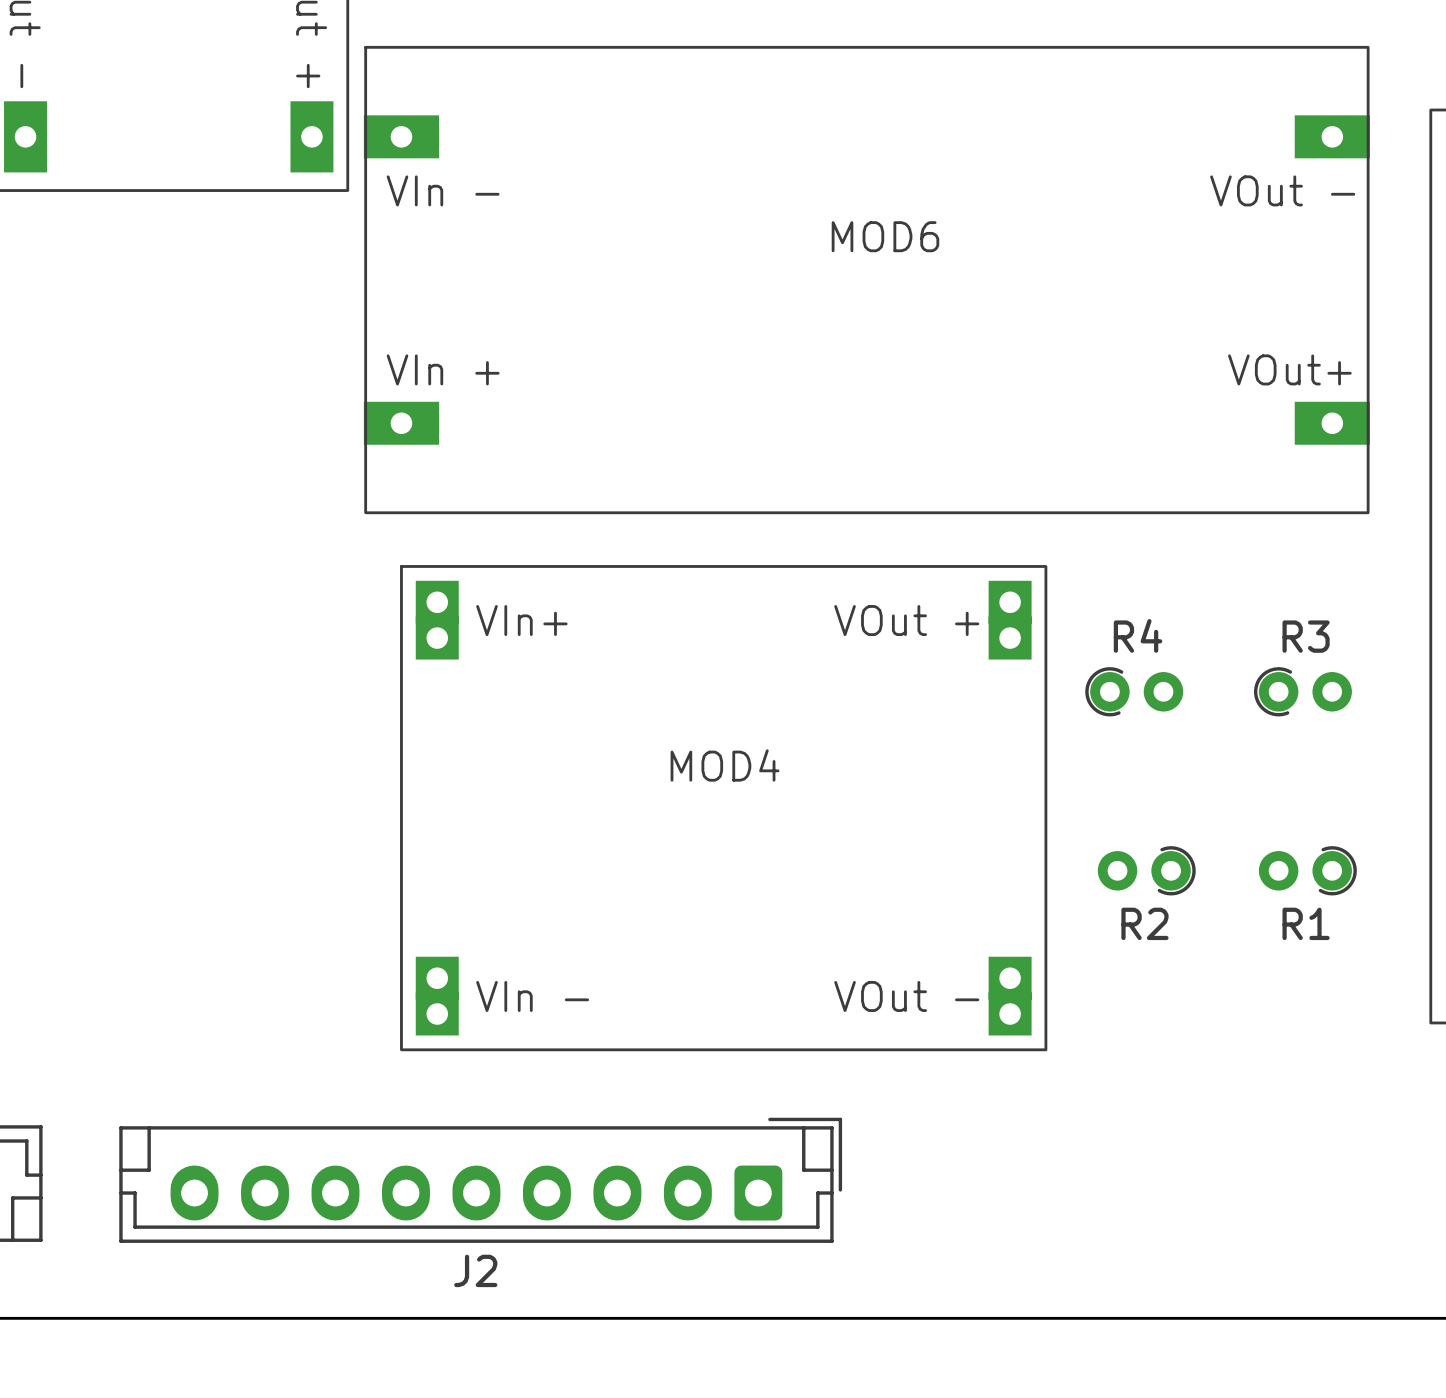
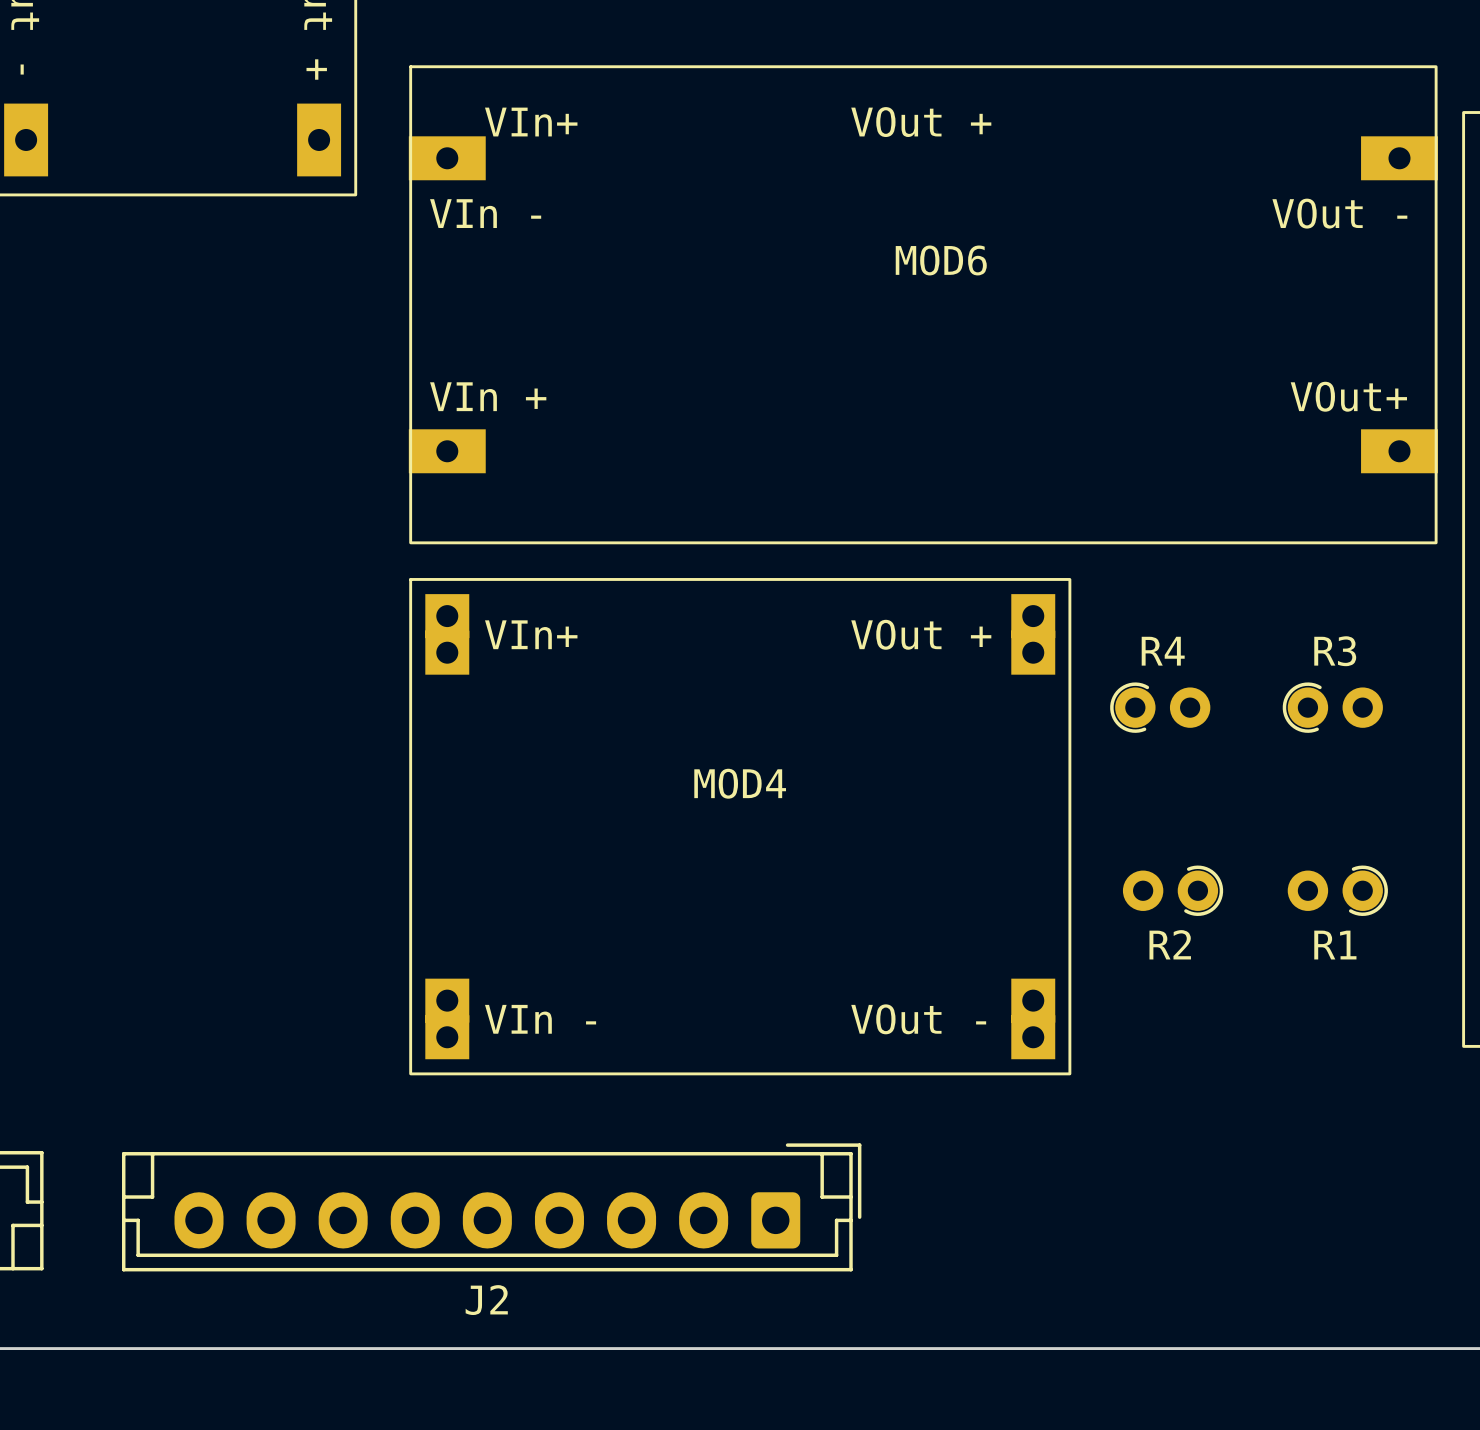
MOD6 text: none -> VIn+ (531, 122)
MOD6 text: none -> VOut + (921, 122)
MOD6 position: (866, 280) -> (923, 304)

